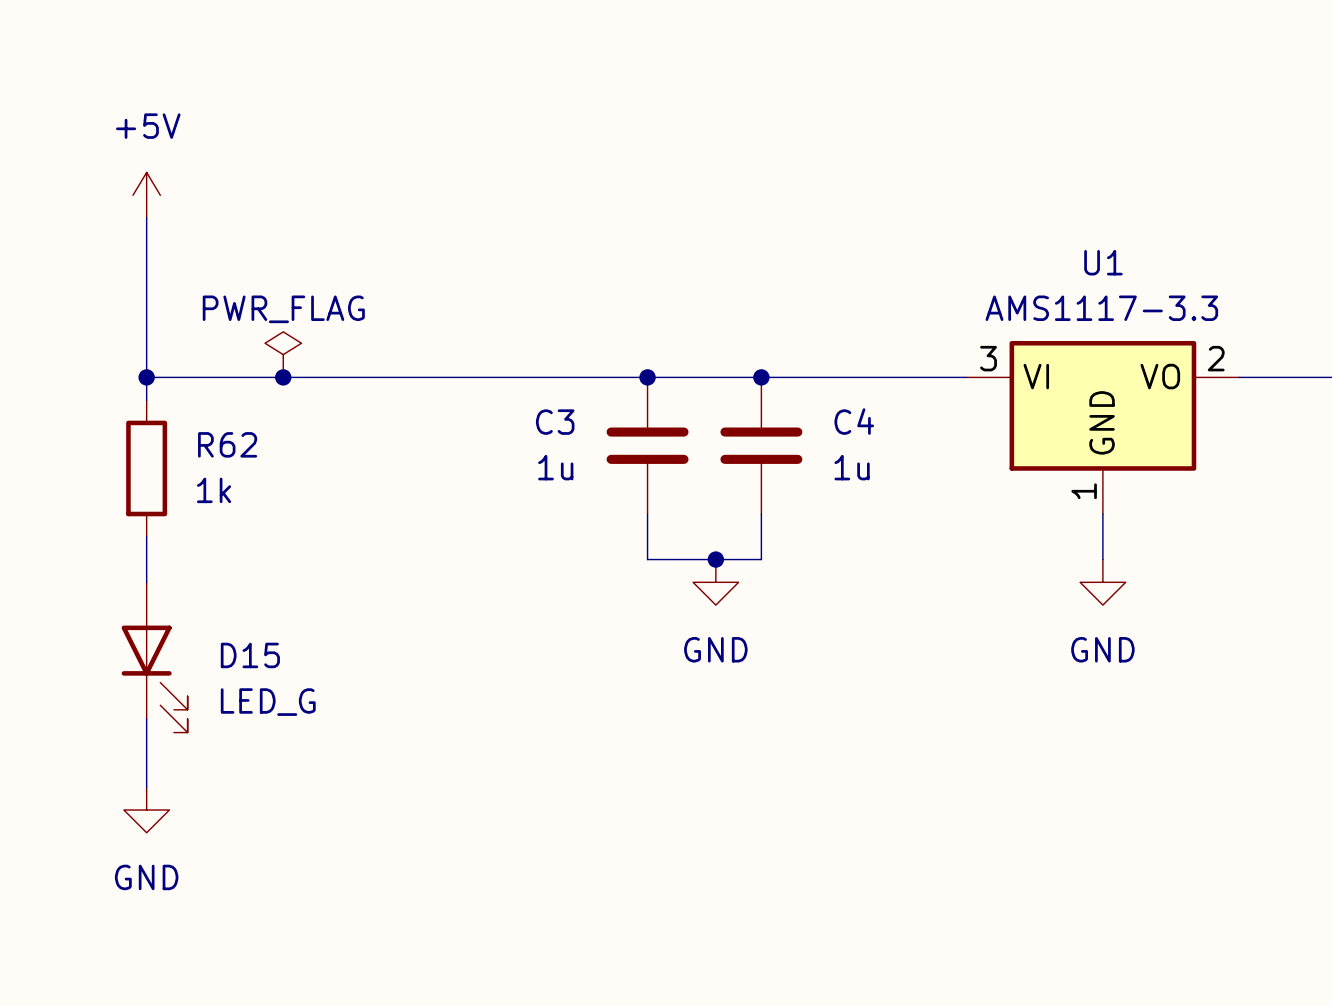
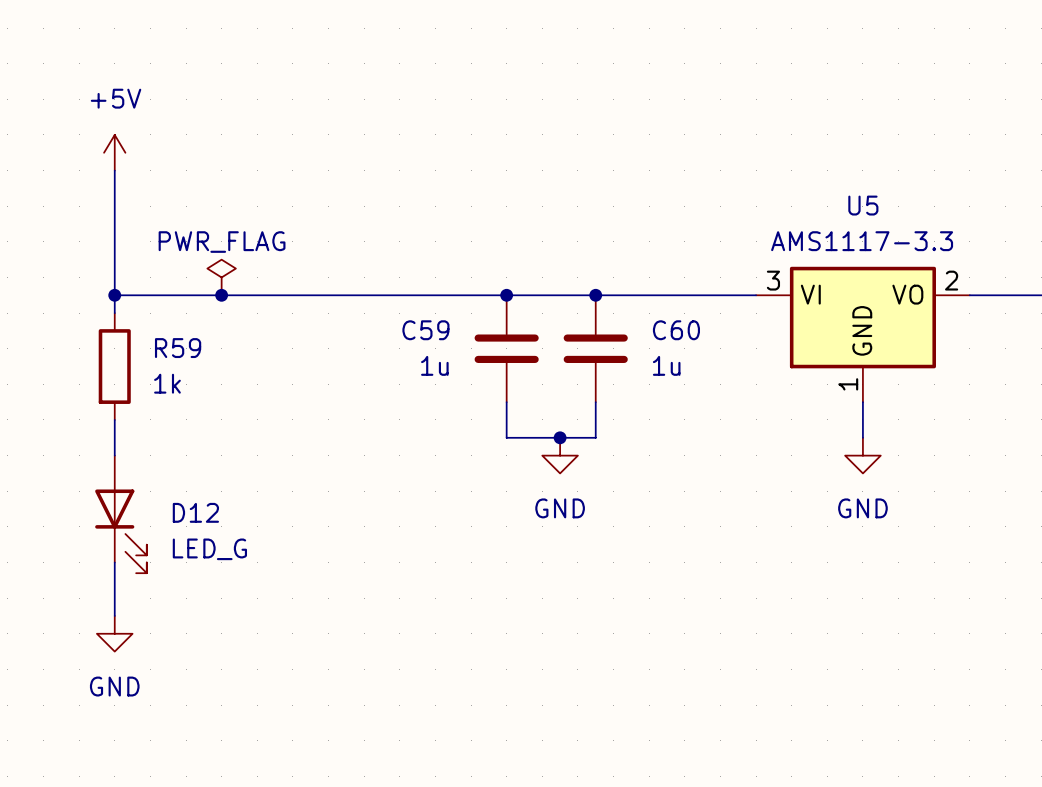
U1 name: U1 (1103, 262) -> U5 (863, 205)
C4 name: C4 (854, 421) -> C60 (676, 330)
C3 name: C3 (555, 422) -> C59 (425, 330)
R62 name: R62 (227, 444) -> R59 (178, 348)
D15 name: D15 (250, 655) -> D12 (195, 512)

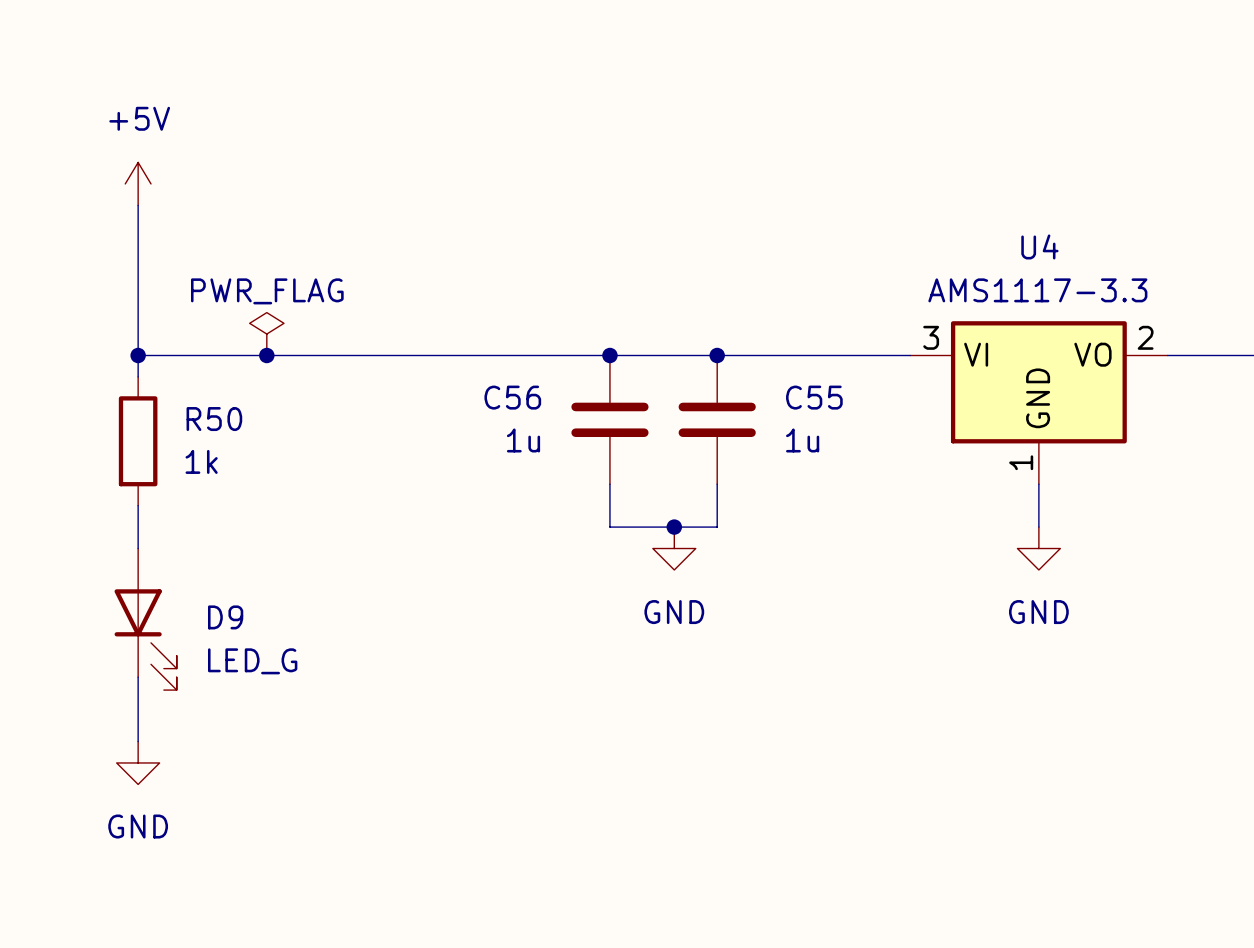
U5 name: U5 (863, 205) -> U4 (1039, 246)
C59 name: C59 (425, 330) -> C56 (512, 397)
C60 name: C60 (676, 330) -> C55 (814, 397)
R59 name: R59 (178, 348) -> R50 (214, 419)
D12 name: D12 (195, 512) -> D9 (225, 617)

